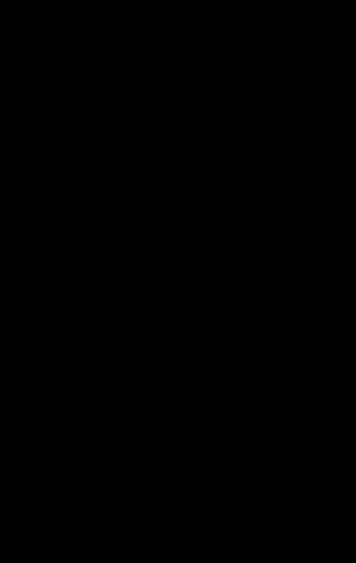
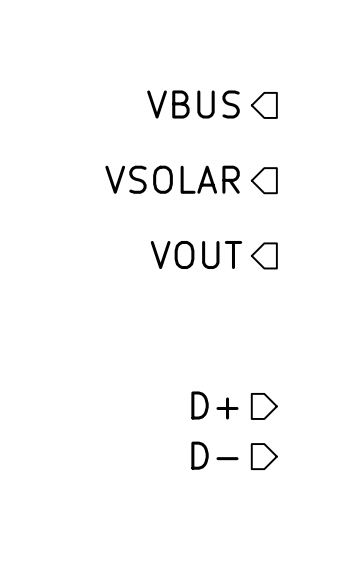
hierarchical label: none -> VBUS (193, 104)
hierarchical label: none -> VSOLAR (172, 179)
hierarchical label: none -> VOUT (196, 254)
hierarchical label: none -> D+ (214, 405)
hierarchical label: none -> D- (214, 455)

